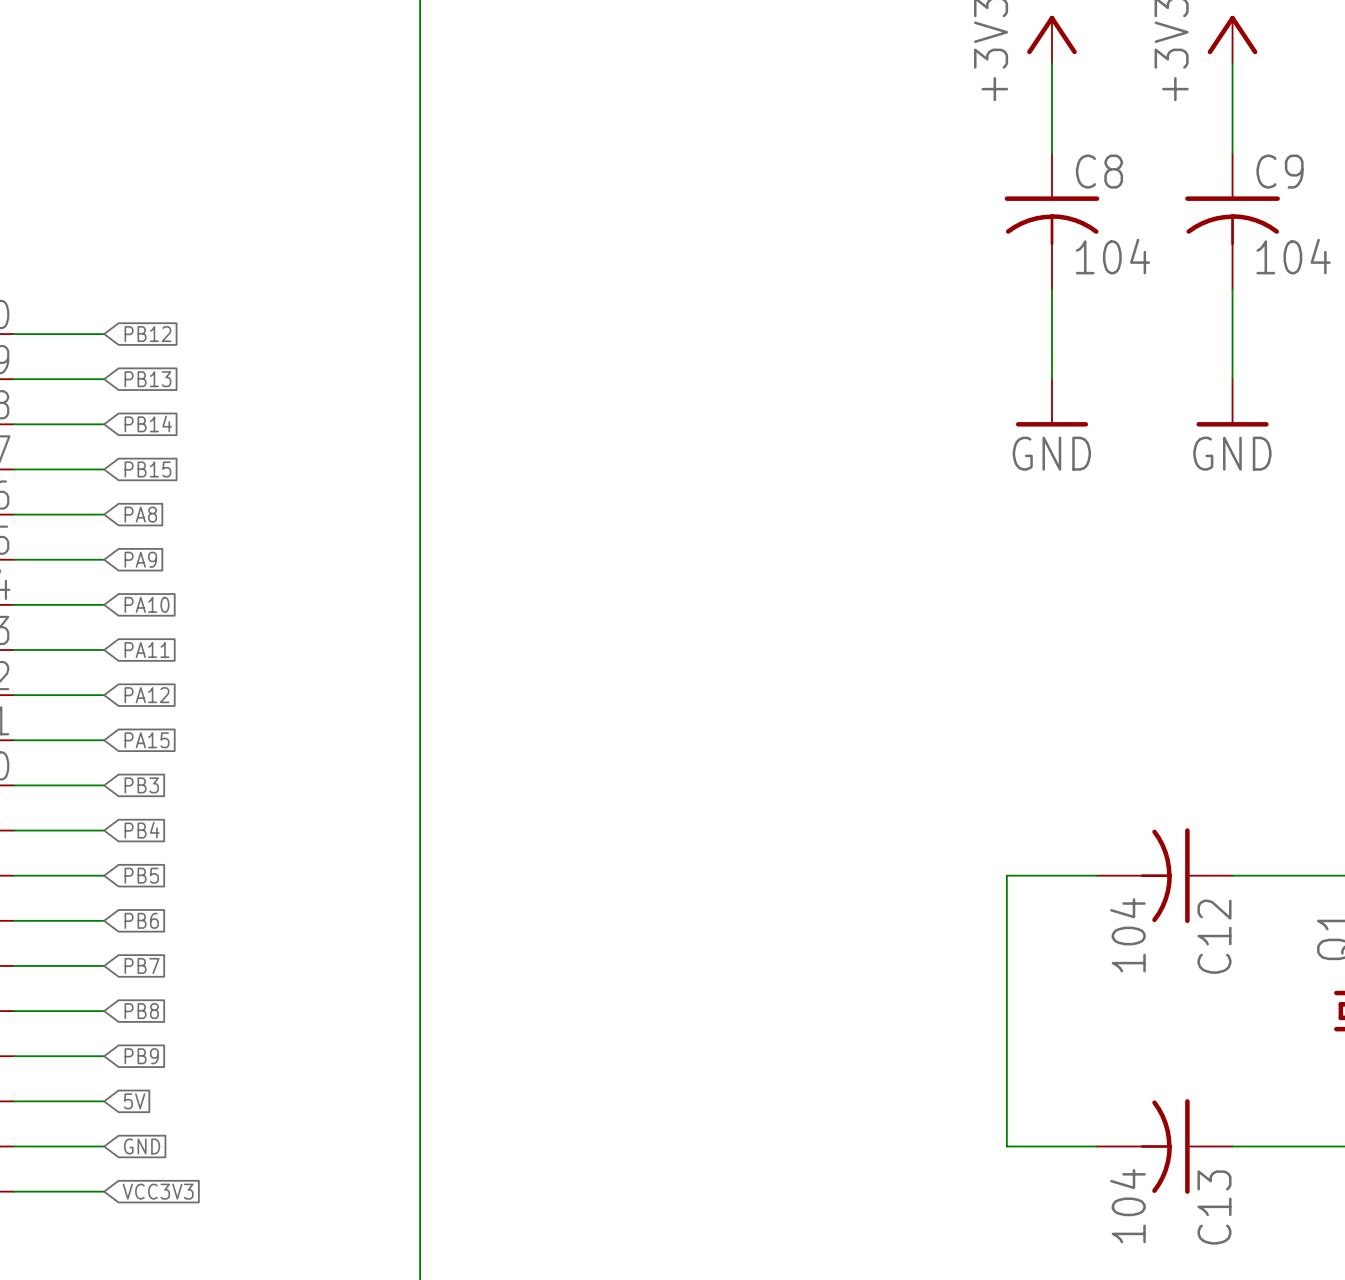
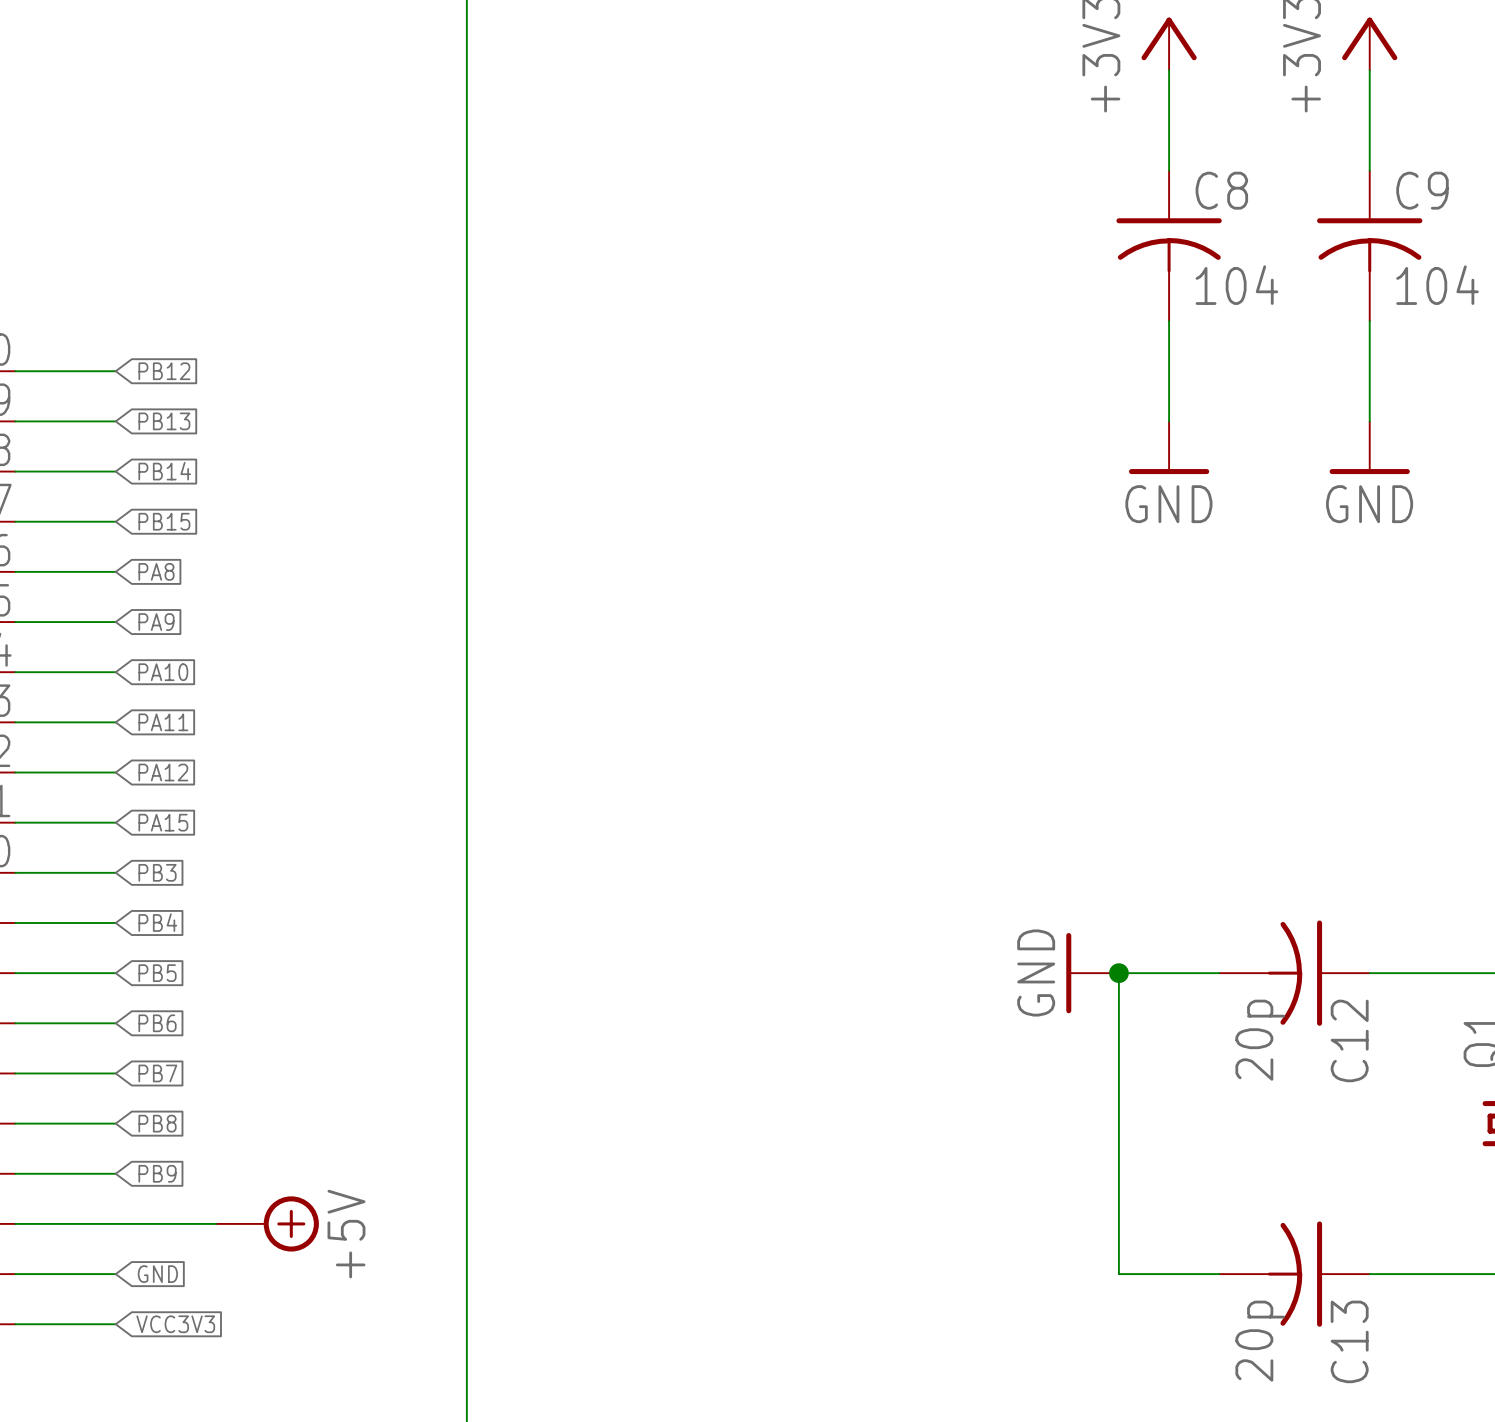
power symbol: none -> GND (1092, 973)
junction: none -> (1118, 973)
C12 value: 104 (1127, 935) -> 20p (1260, 1040)
wire: none -> (115, 1223) (216, 1223)
global label: 5V (134, 1101) -> none
power symbol: none -> +5V (267, 1223)
C13 value: 104 (1127, 1206) -> 20p (1260, 1341)

